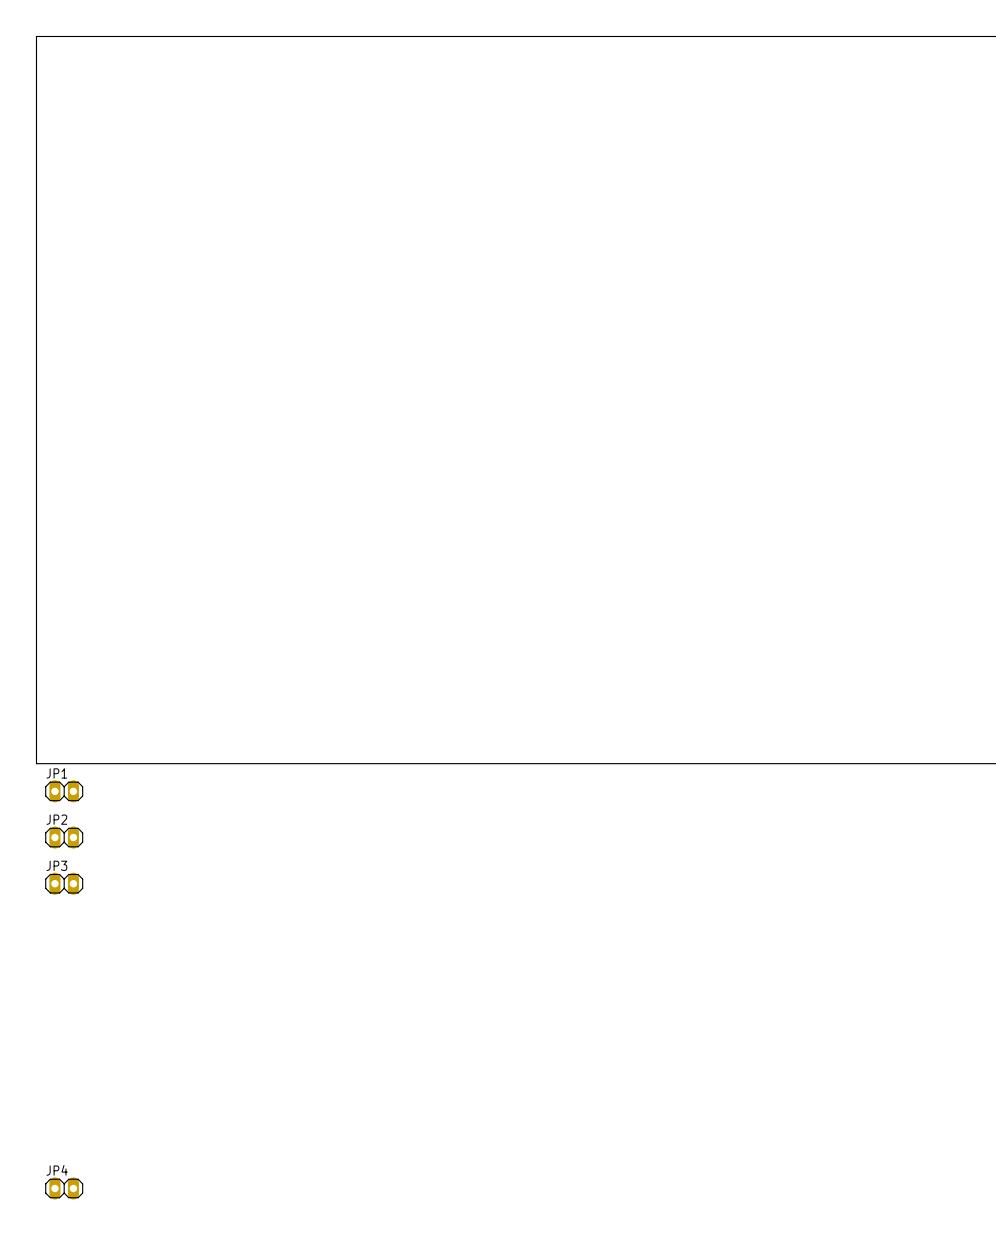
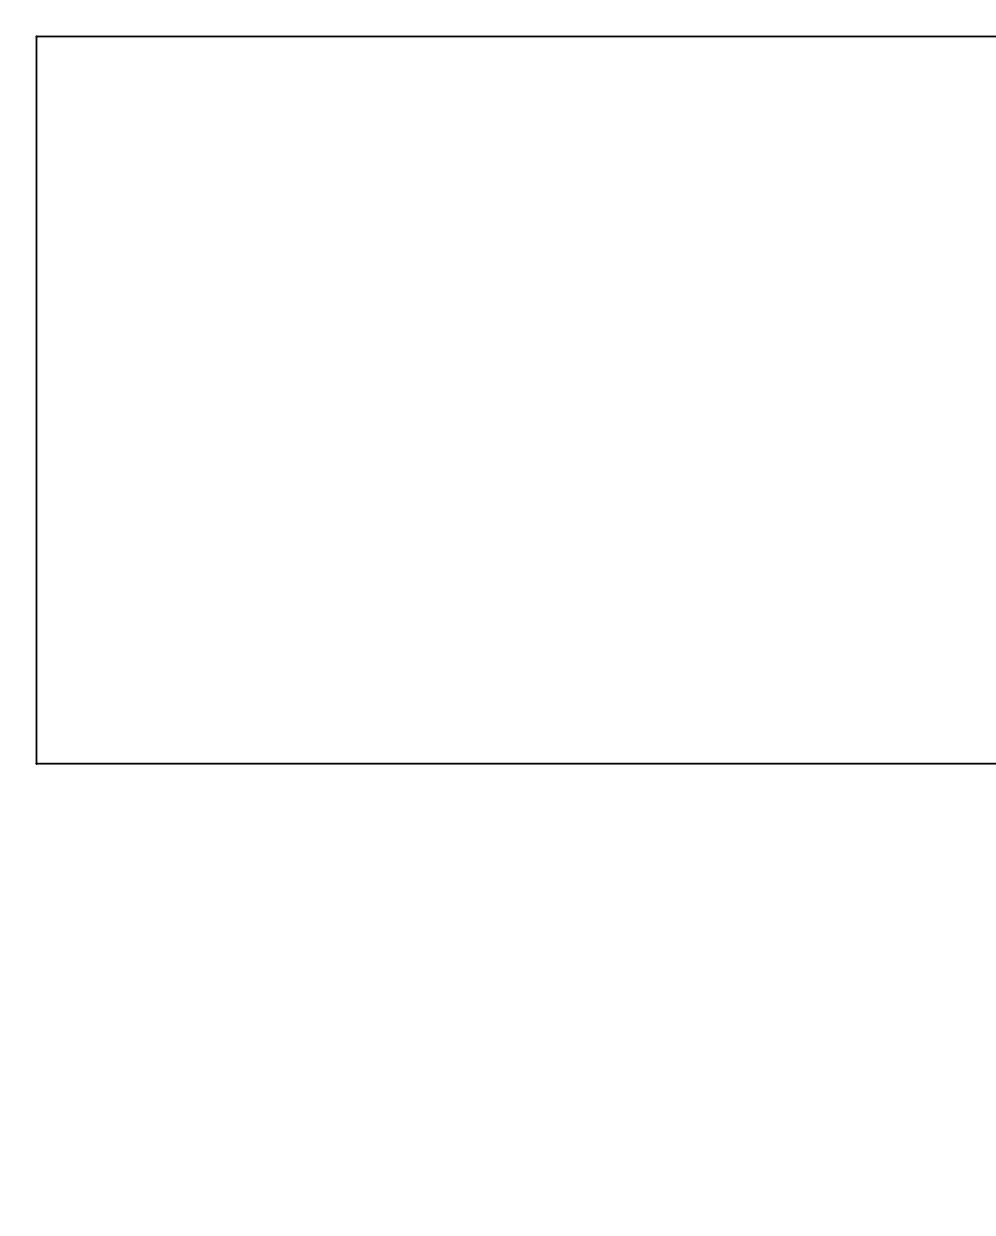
JP1: (64, 791) -> none
JP2: (64, 837) -> none
JP3: (64, 883) -> none
JP4: (64, 1188) -> none

